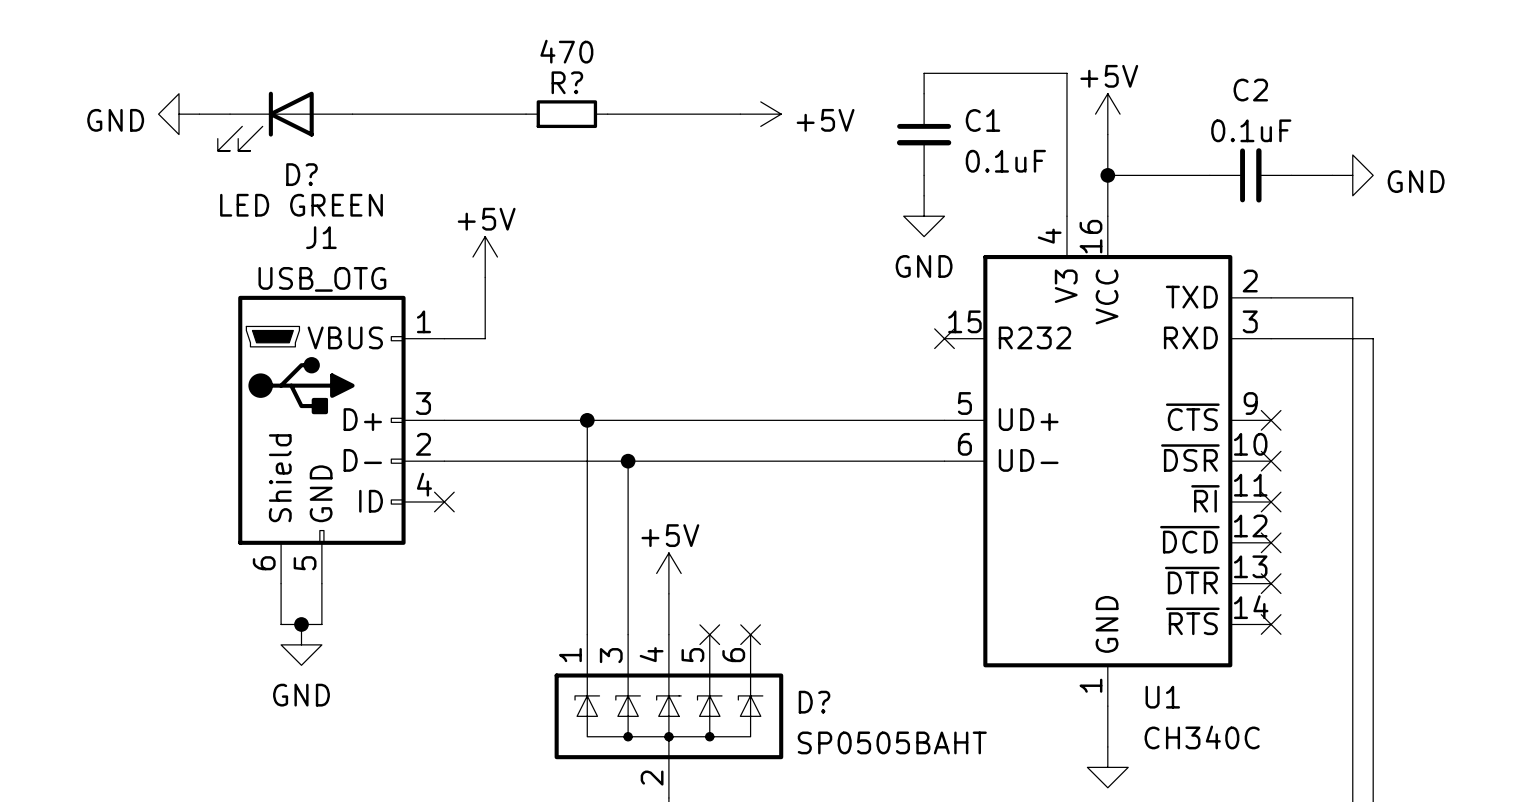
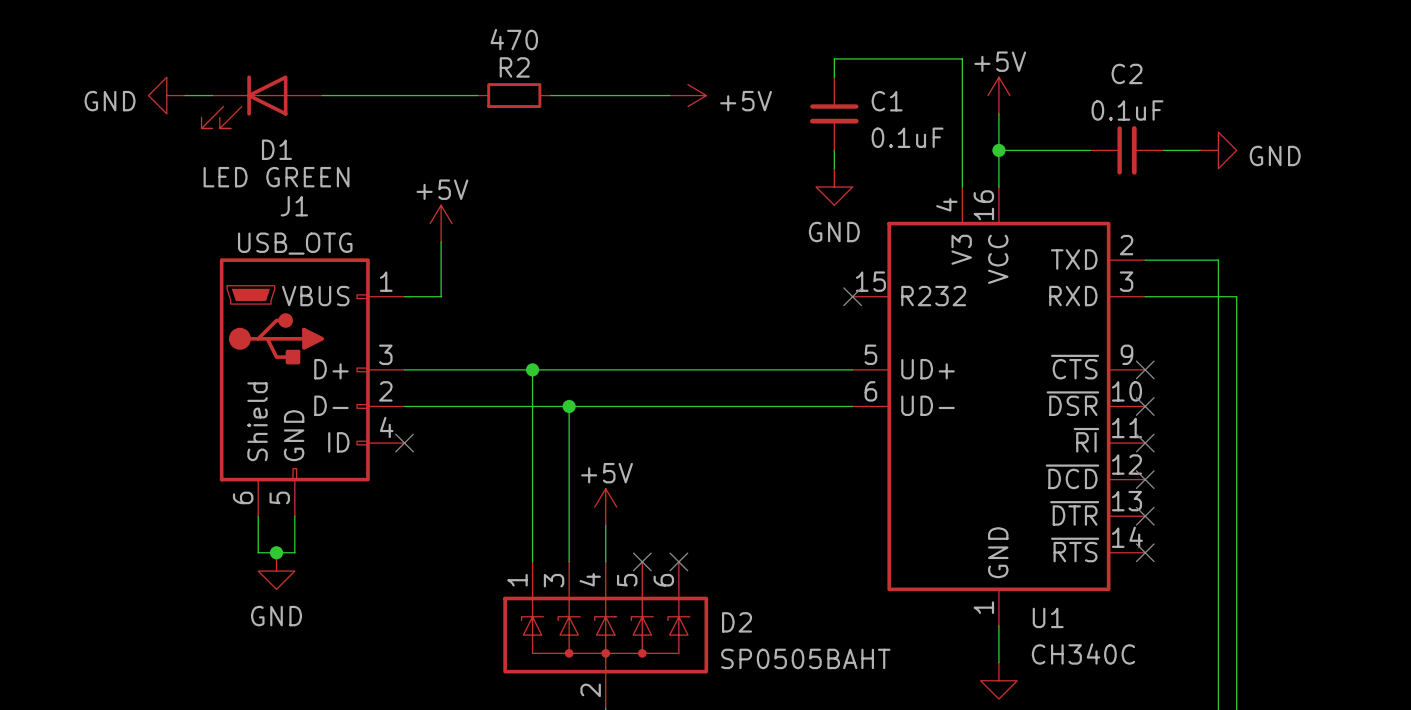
R? name: R? (567, 82) -> R2 (514, 67)
D? name: D? (301, 174) -> D1 (276, 149)
D? name: D? (814, 702) -> D2 (737, 622)

